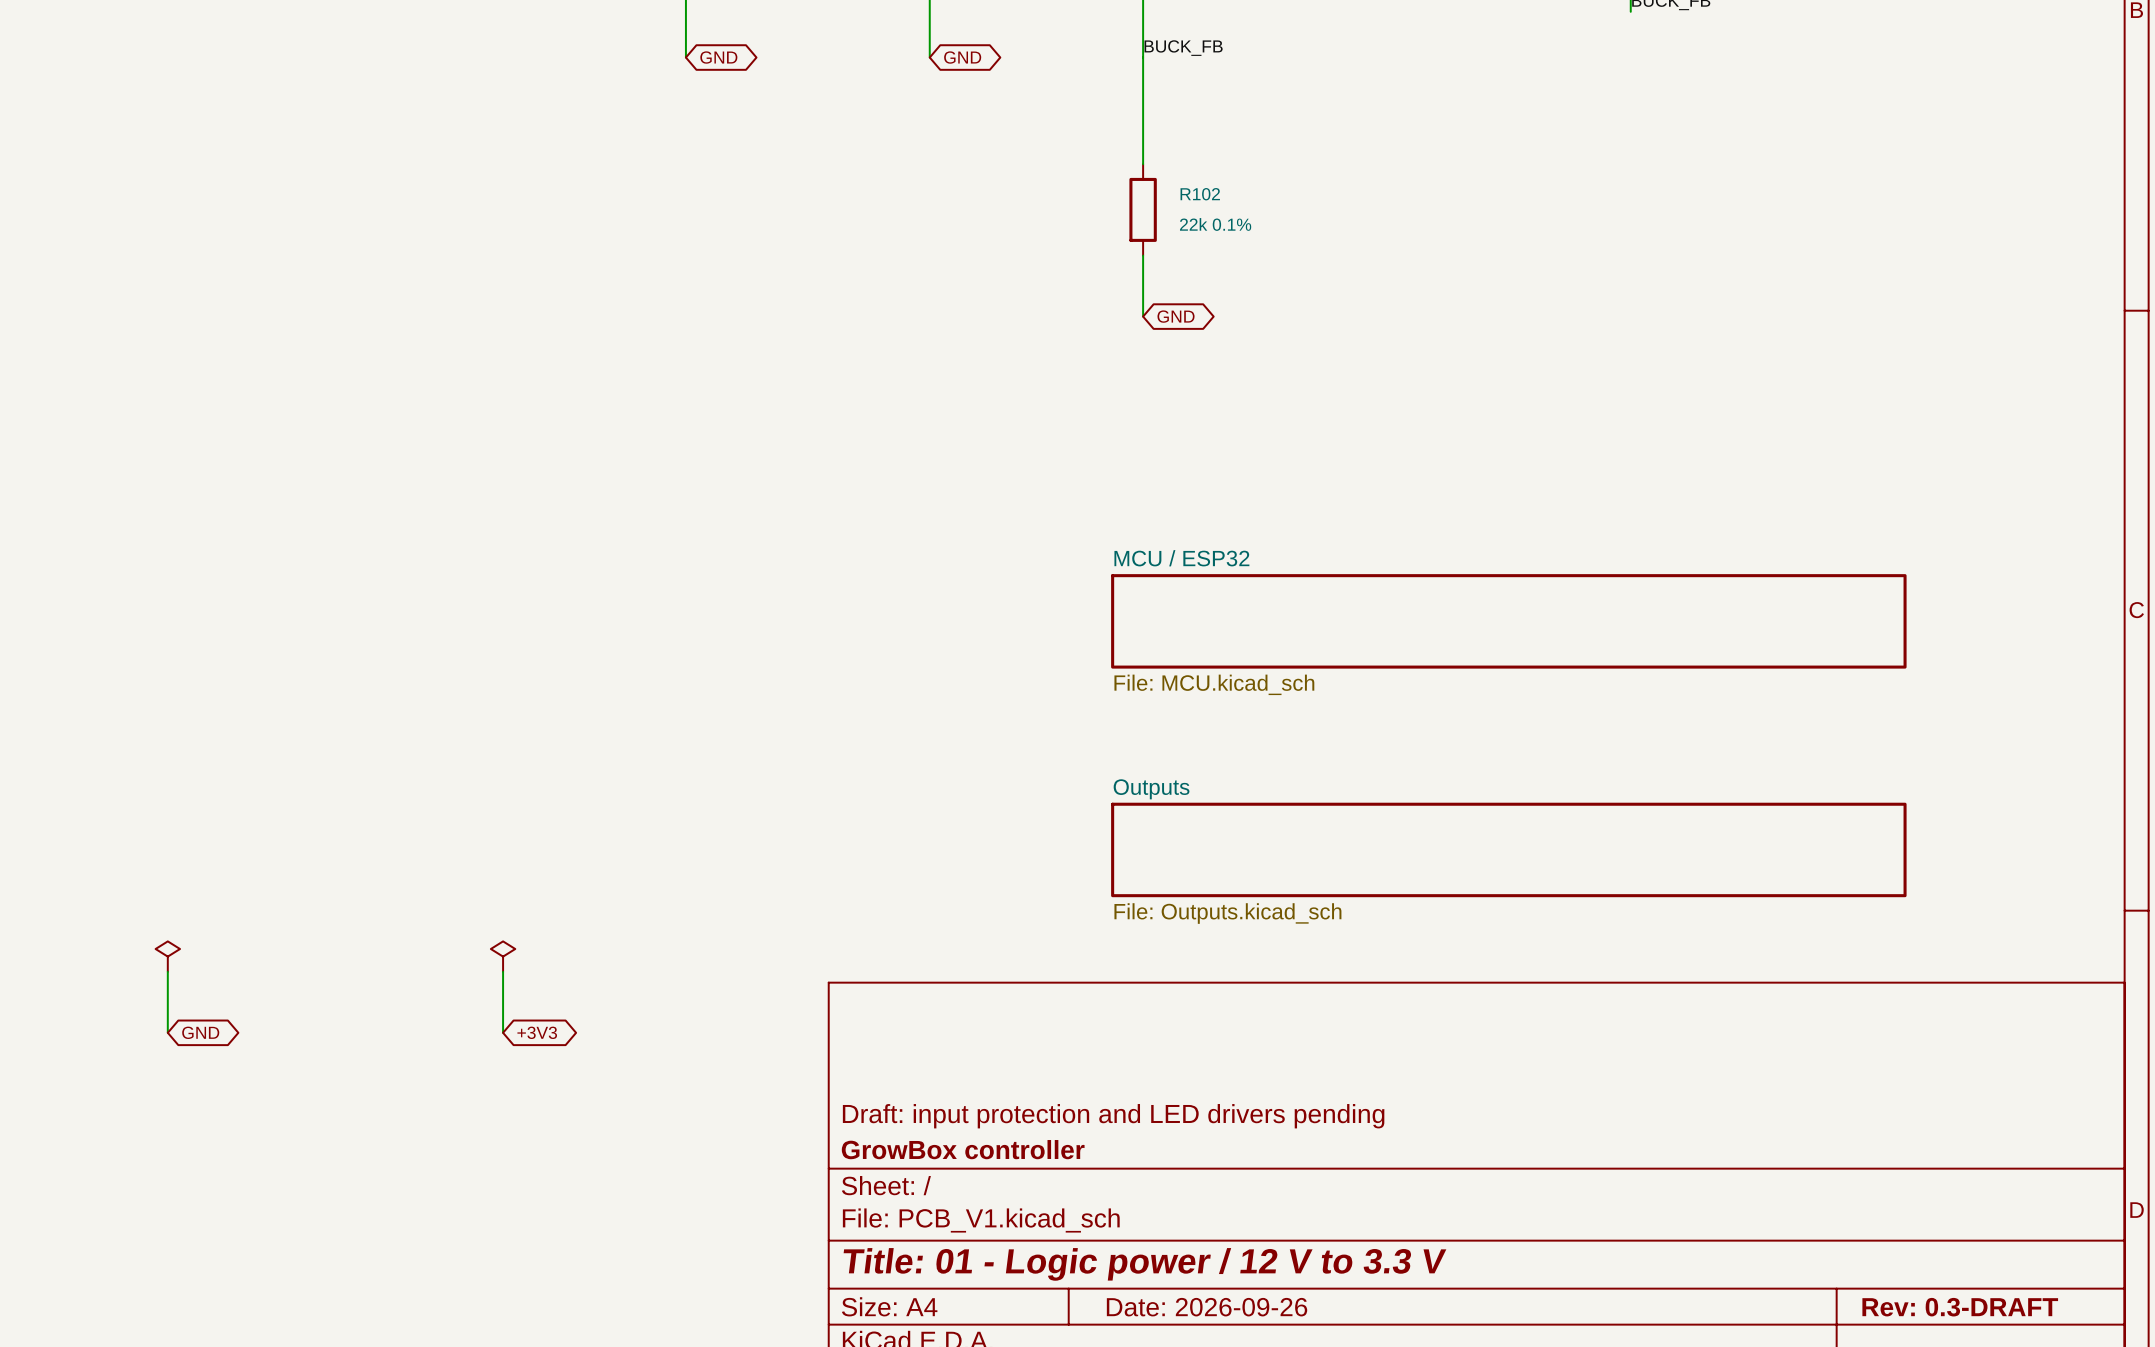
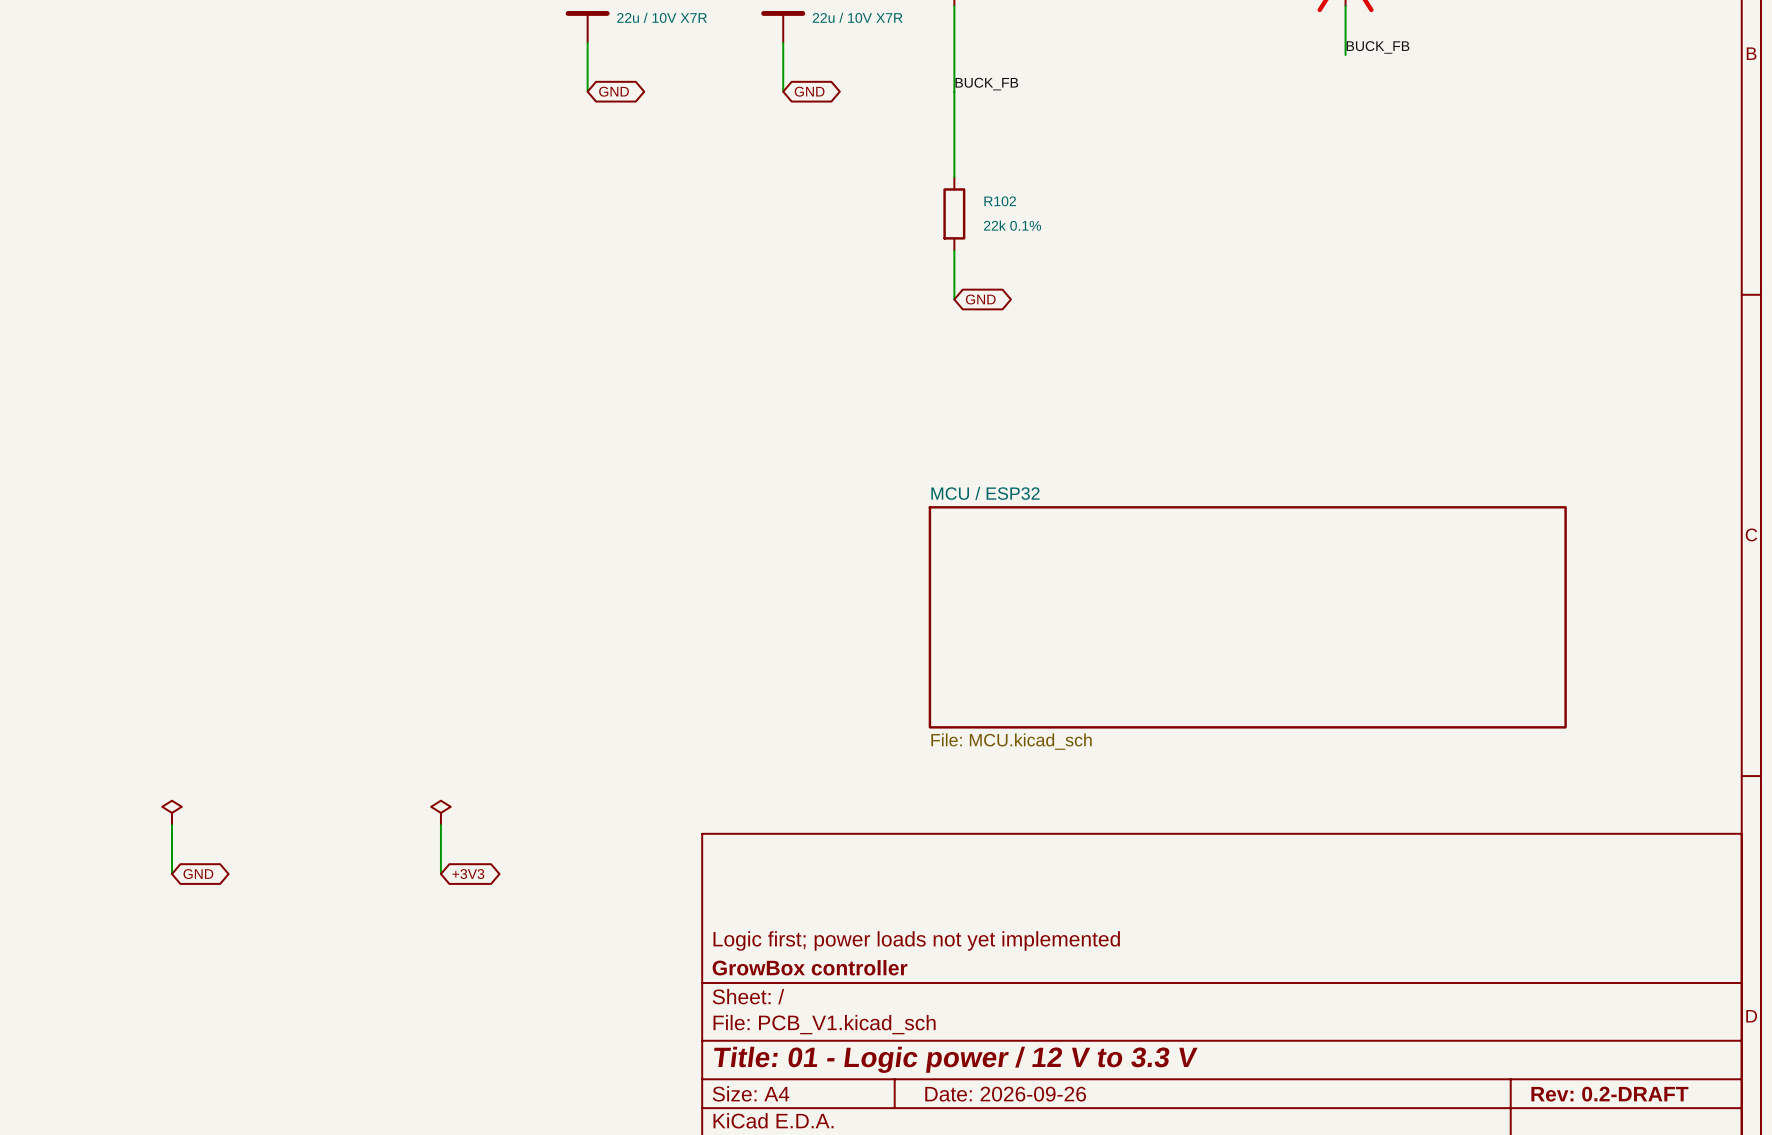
sheet MCU / ESP32 shape: [1111, 574, 1907, 669] -> [928, 506, 1567, 729]
sheet MCU / ESP32 value position: File: MCU.kicad_sch (1214, 684) -> File: MCU.kicad_sch (1011, 741)
sheet Outputs: File: Outputs.kicad_sch (1508, 849) -> none
title block: Draft: input protection and LED drivers pending (1113, 1116) -> Logic first; power loads not yet implemented (916, 940)
title block: Rev: 0.3-DRAFT (1960, 1307) -> Rev: 0.2-DRAFT (1609, 1094)

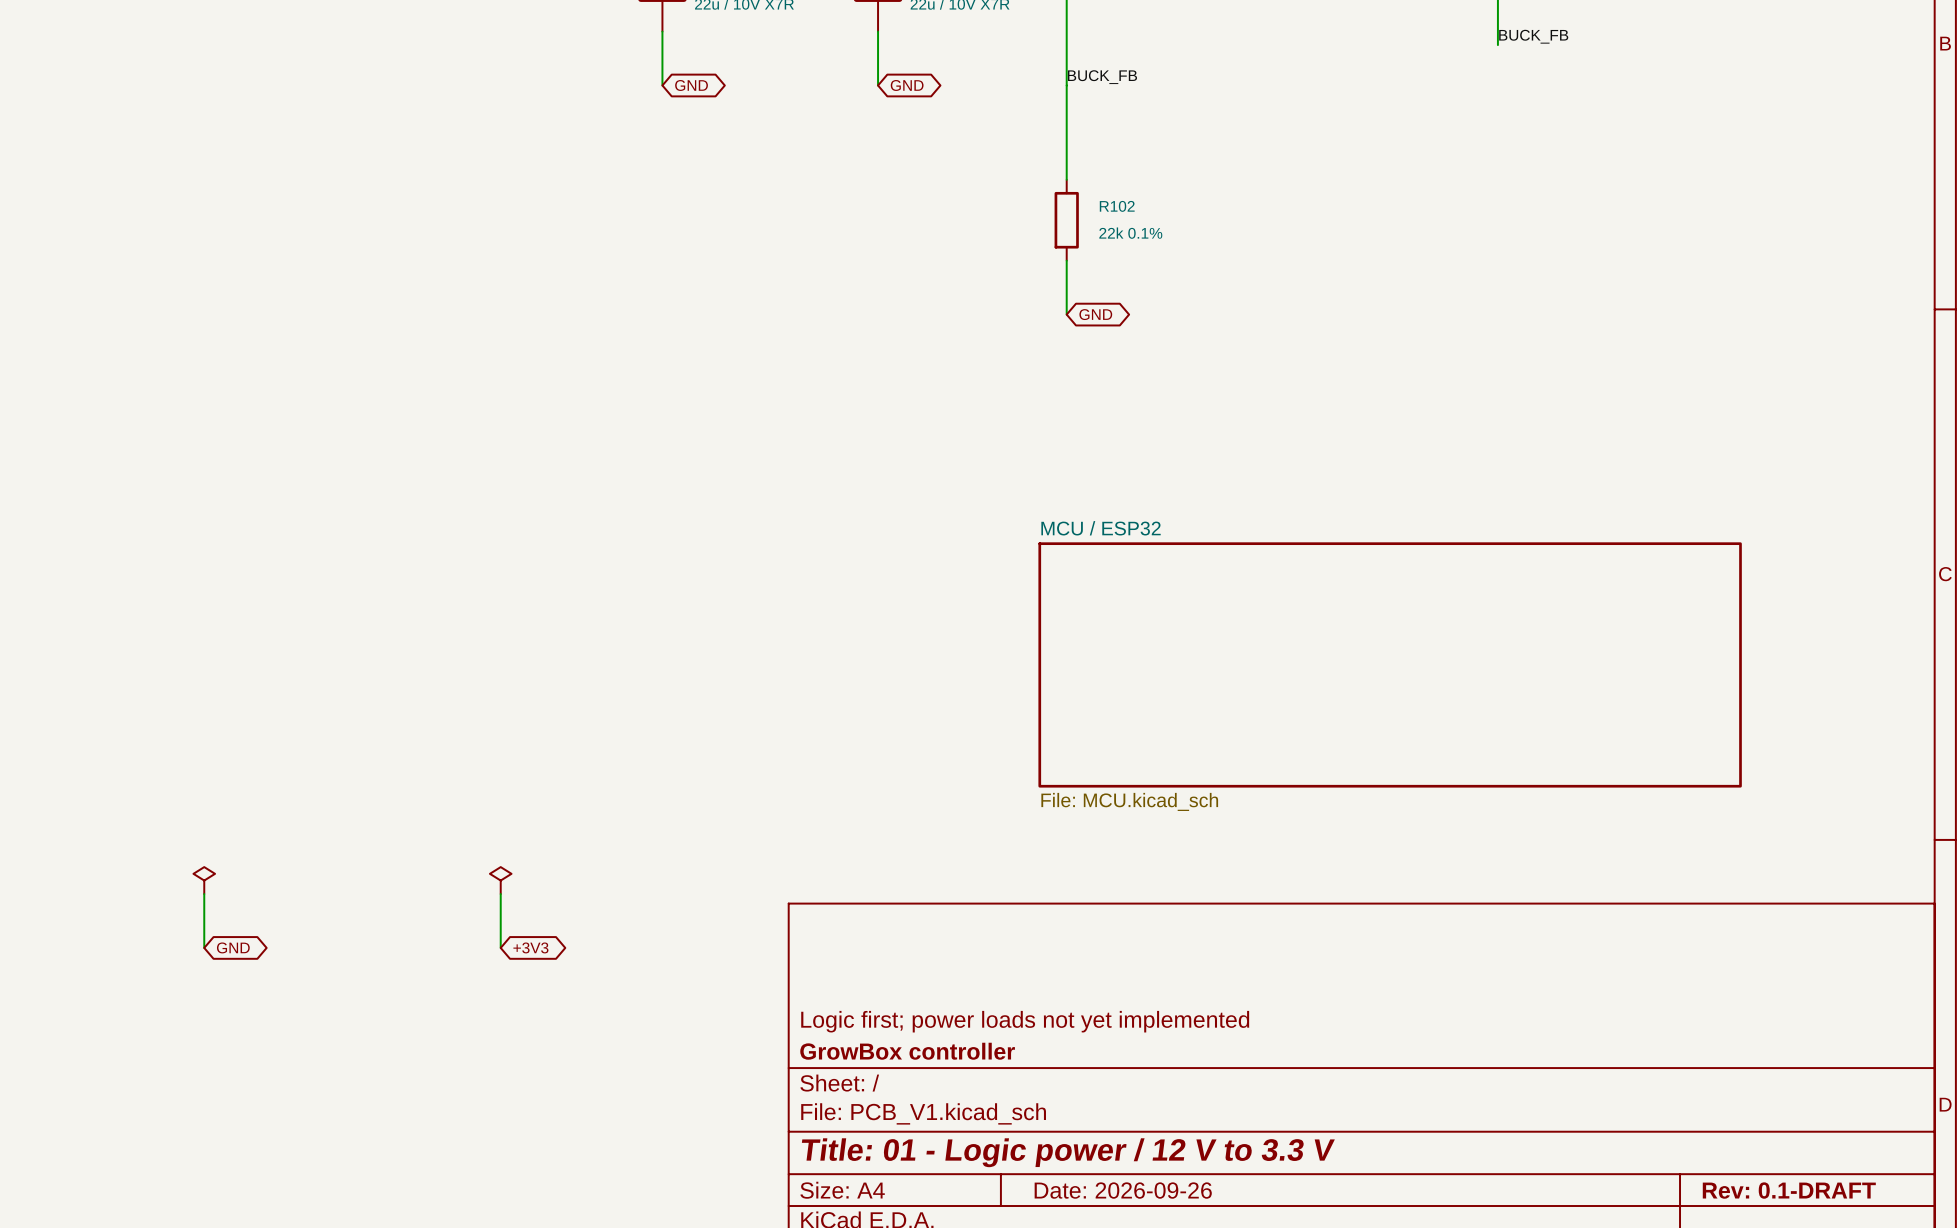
title block: Rev: 0.2-DRAFT (1609, 1094) -> Rev: 0.1-DRAFT (1789, 1190)

